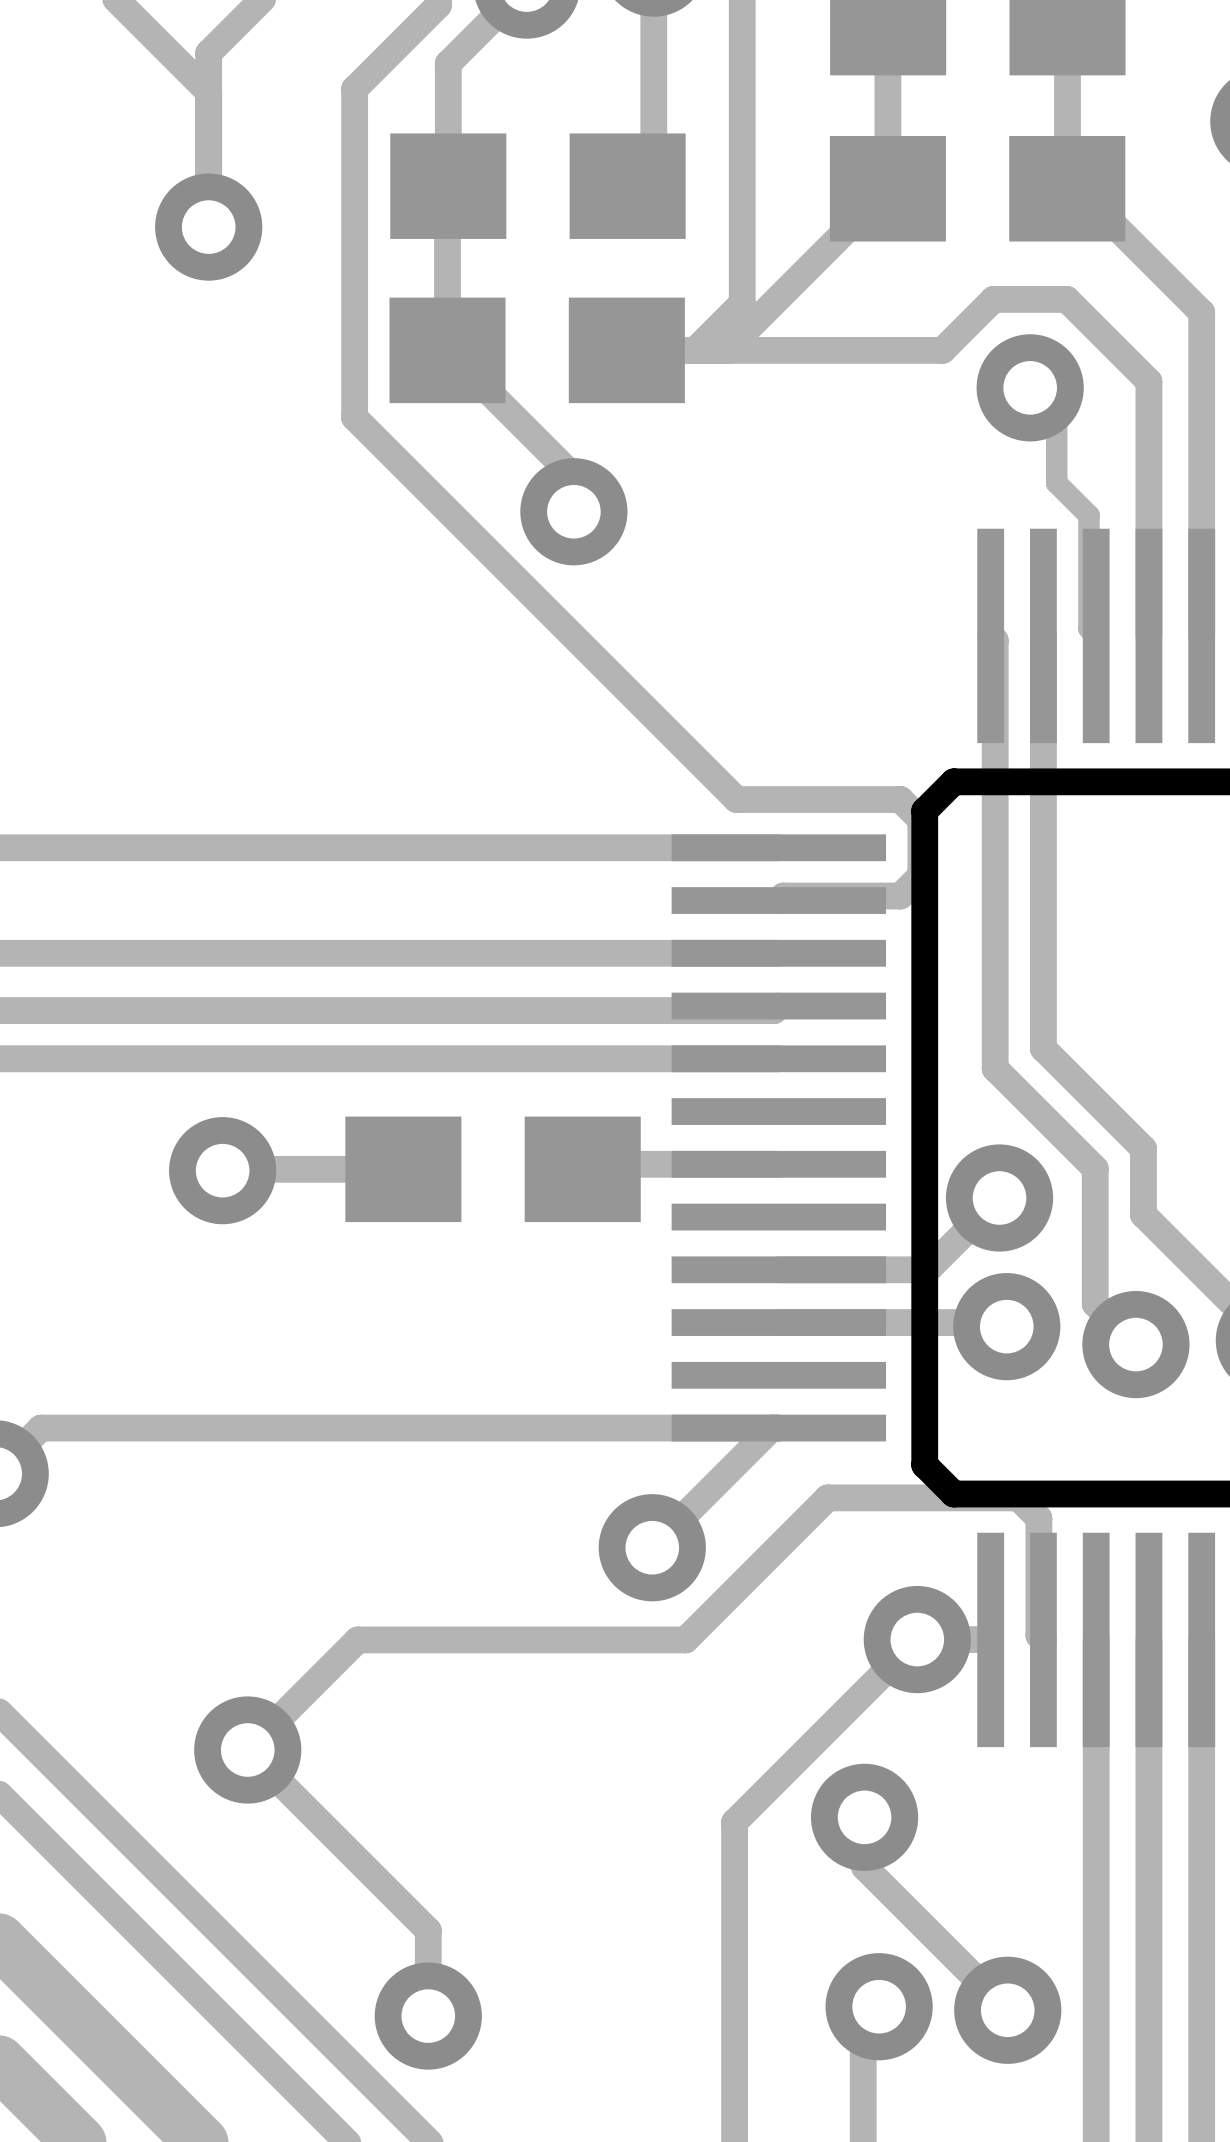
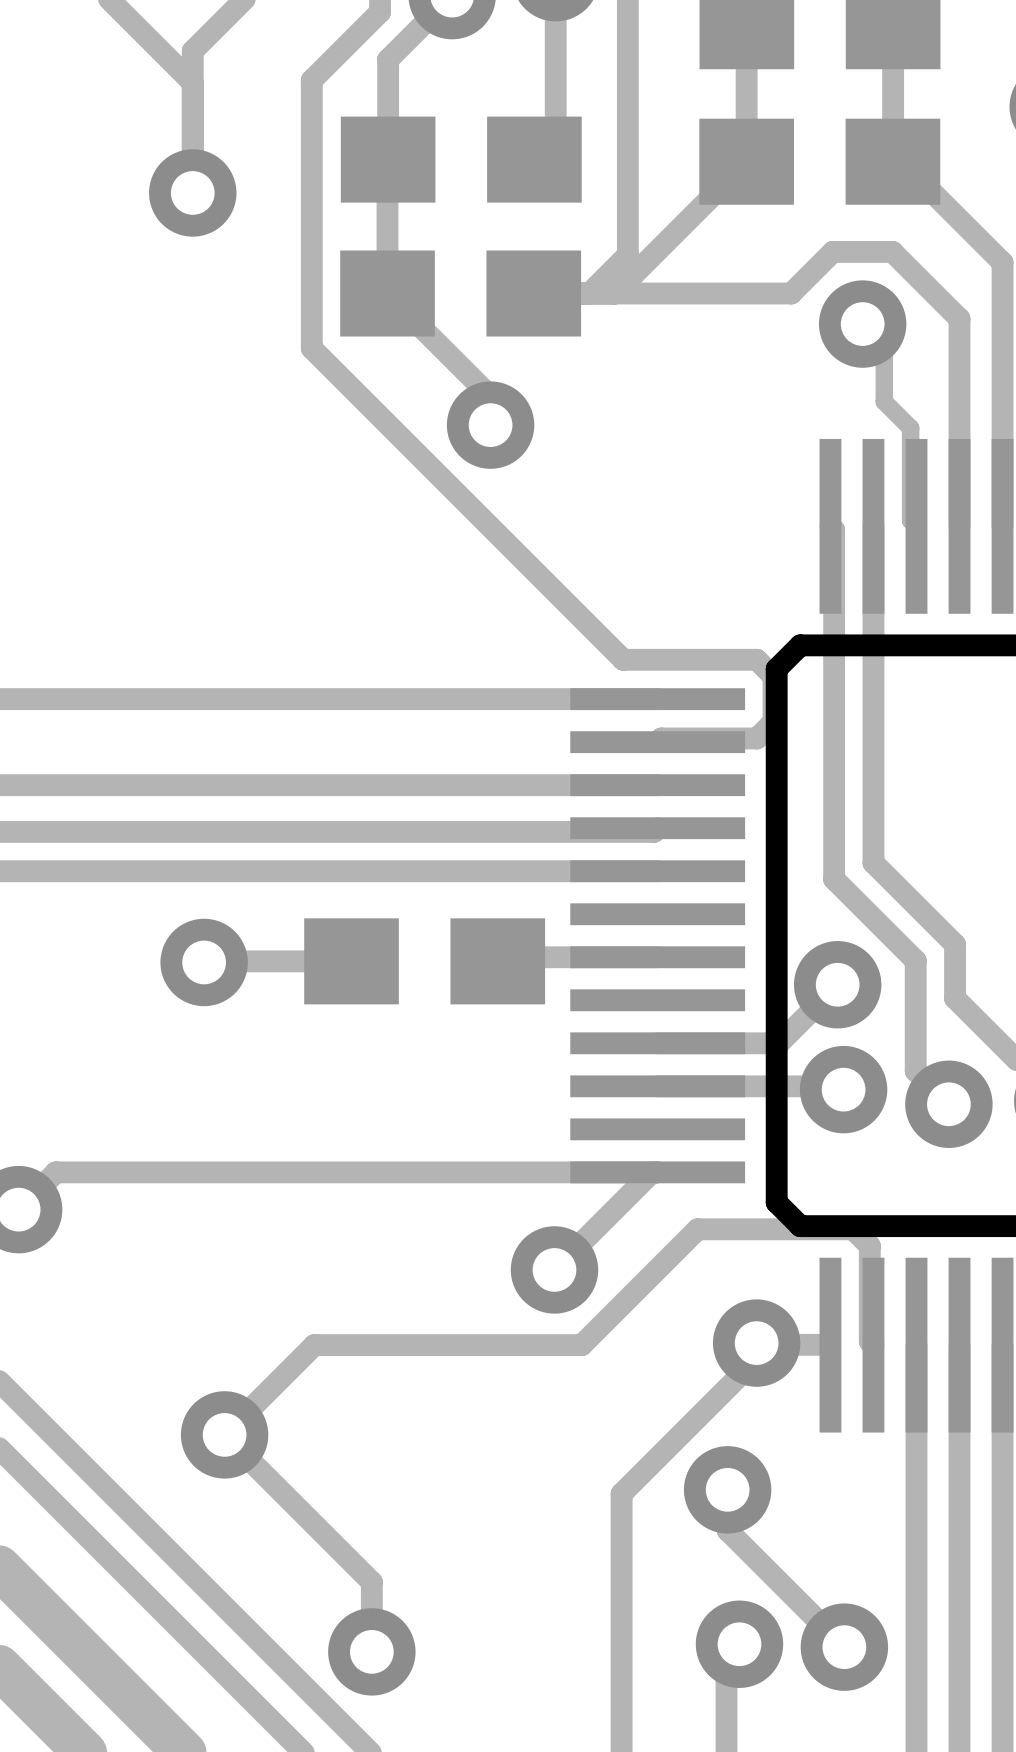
via position: (917, 1639) -> (756, 1343)

